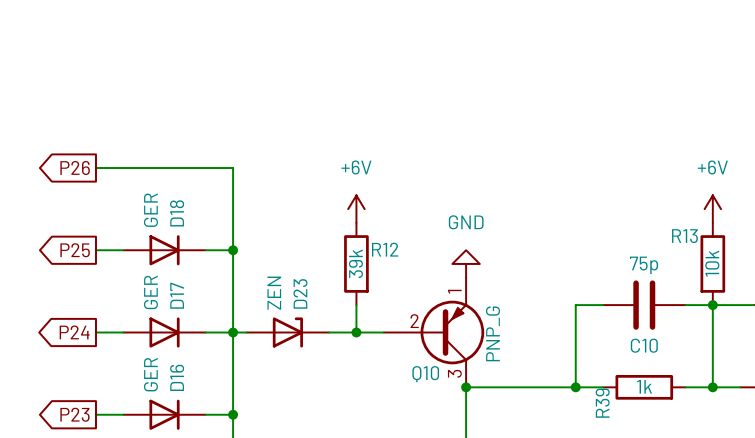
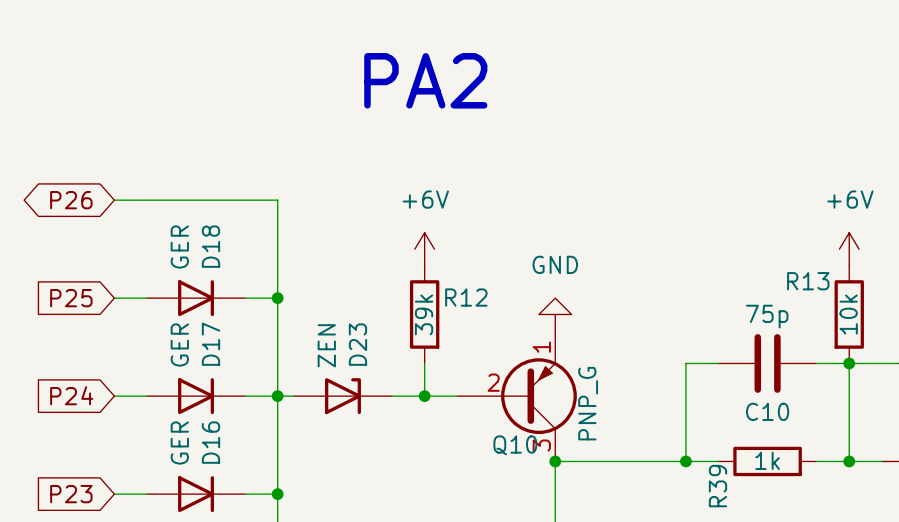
text: none -> PA2 (425, 80)
global label shape: output (75, 168) -> bidirectional (71, 200)
global label shape: output (75, 250) -> input (71, 298)
global label shape: output (74, 332) -> input (71, 395)
global label shape: output (74, 414) -> input (71, 494)

